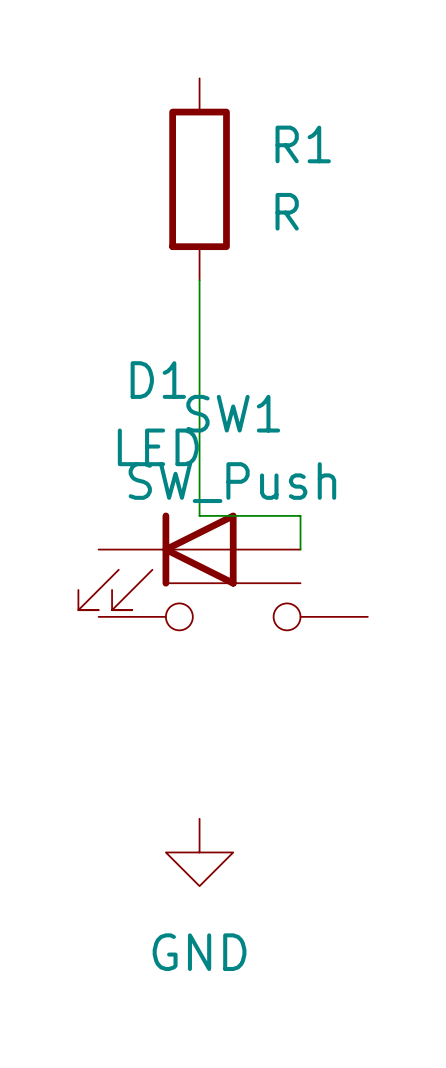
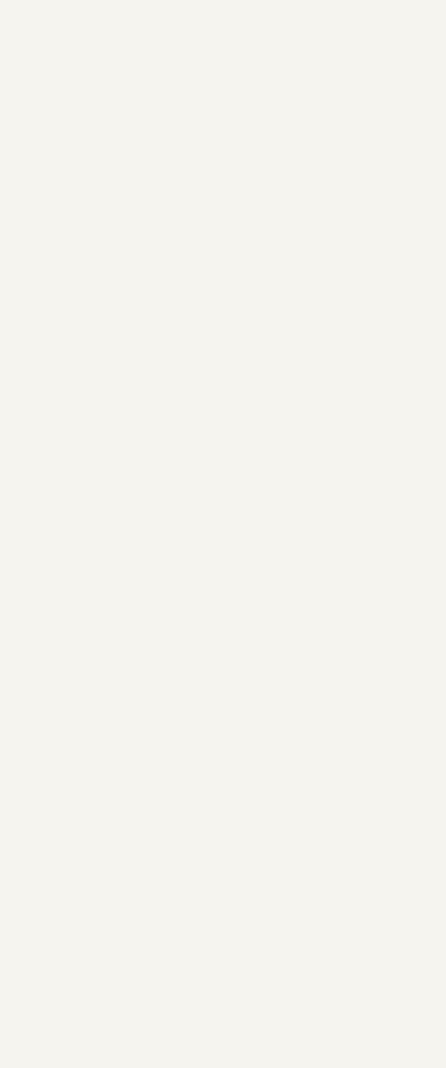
R1: R (199, 179) -> none
wire: (199, 280) (199, 515) (300, 515) (300, 549) -> none
D1: LED (189, 561) -> none
SW1: SW_Push (233, 583) -> none
power symbol: GND (199, 852) -> none

